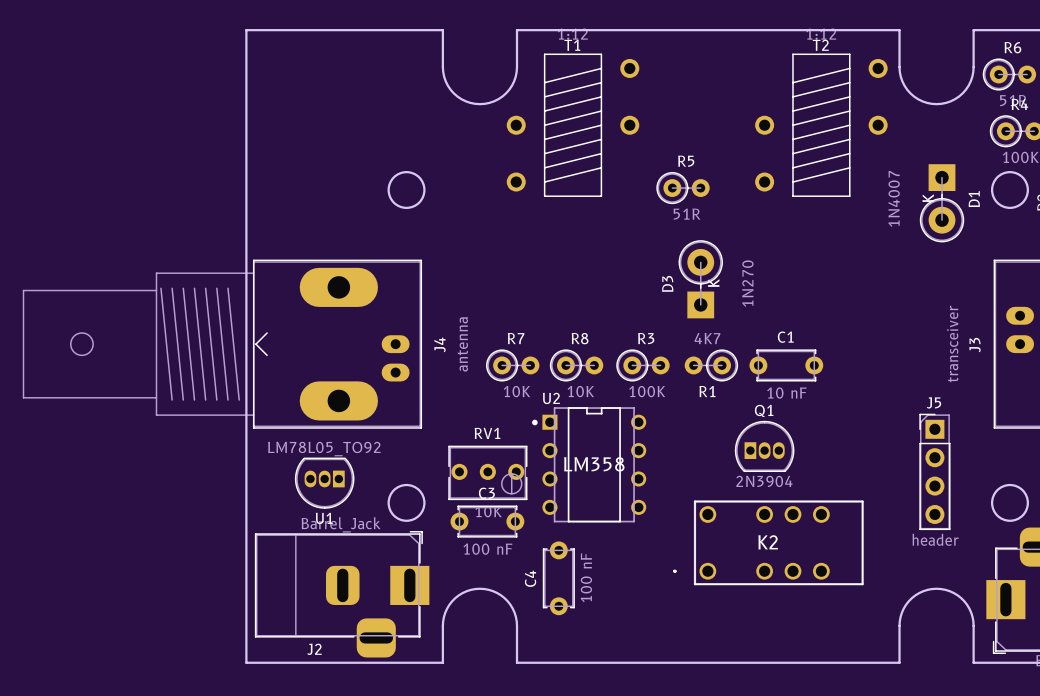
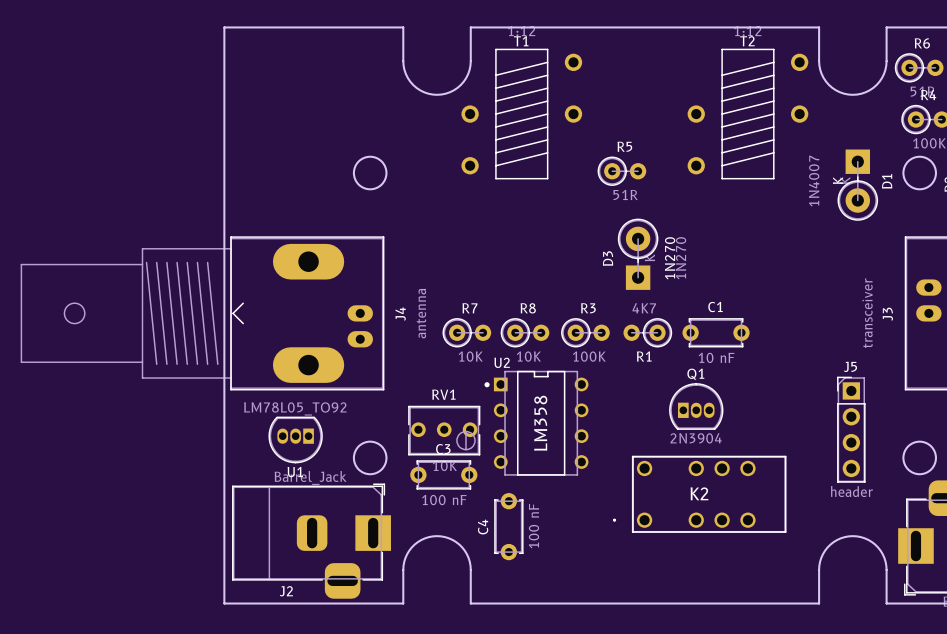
D1 footprint: [919, 164, 965, 243] -> [837, 149, 878, 221]
D3 footprint: [678, 240, 723, 319] -> [617, 218, 659, 290]
U2 value rotation: 0° (594, 464) -> 90° counterclockwise (540, 423)

